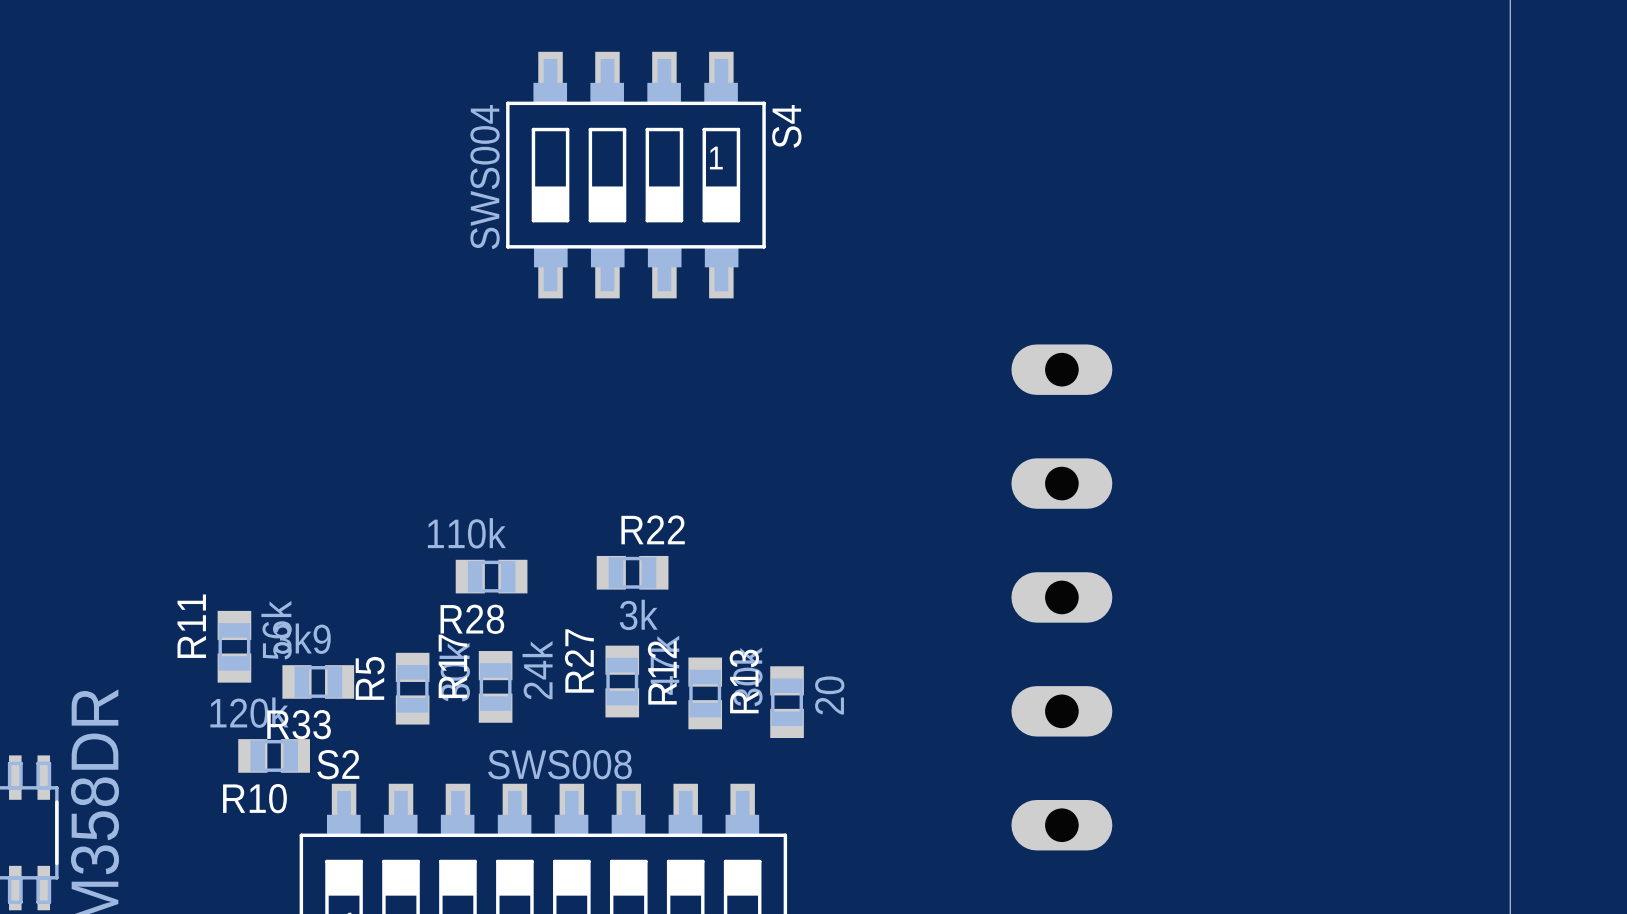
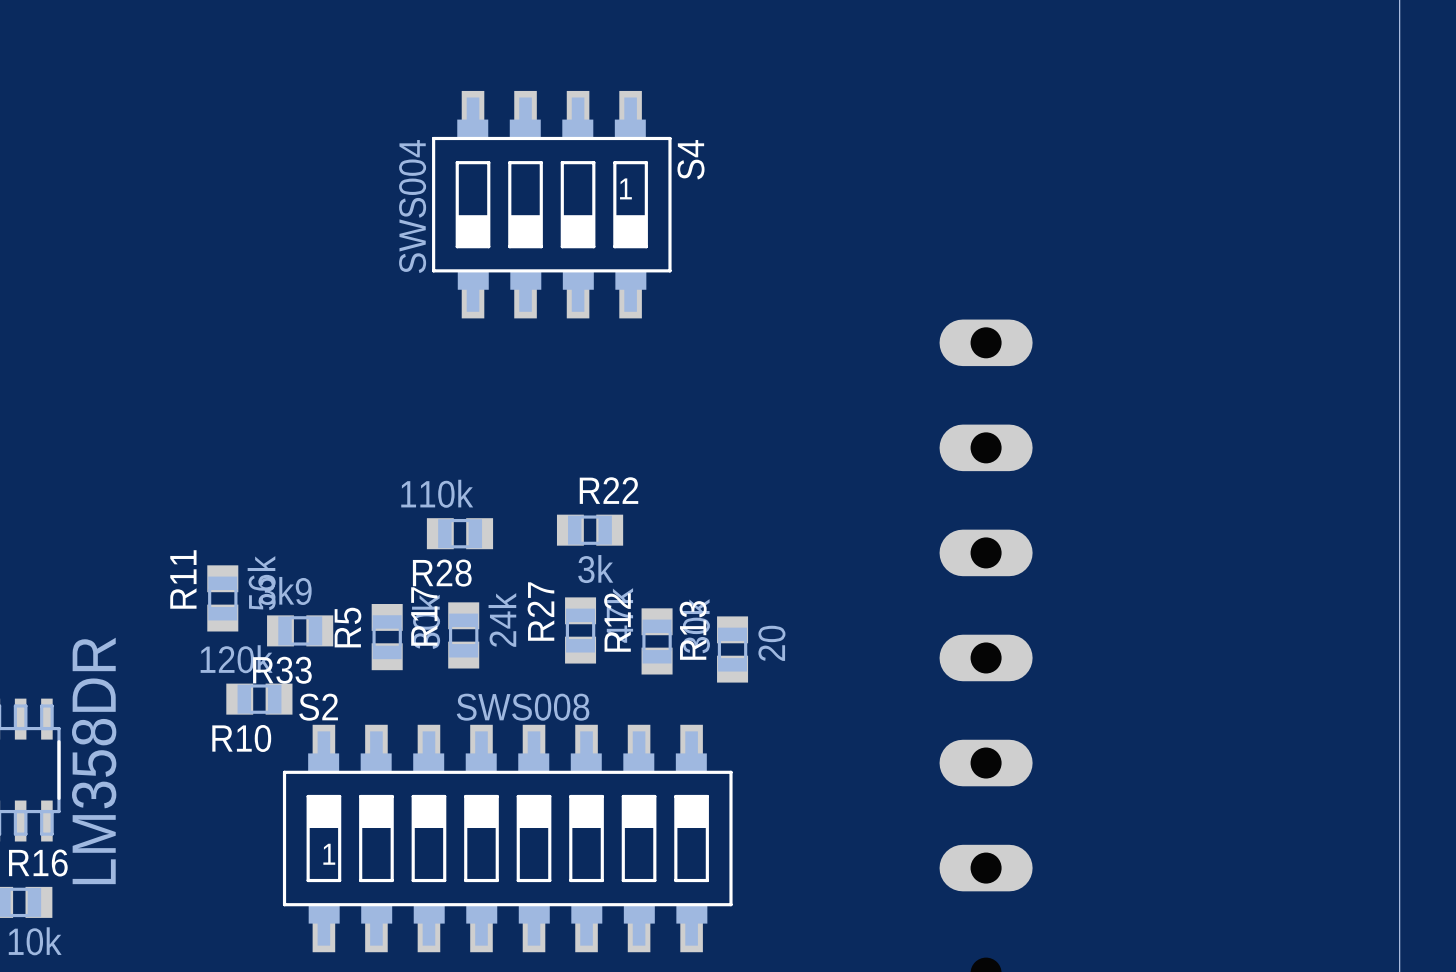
S4 position: (635, 175) -> (551, 204)

